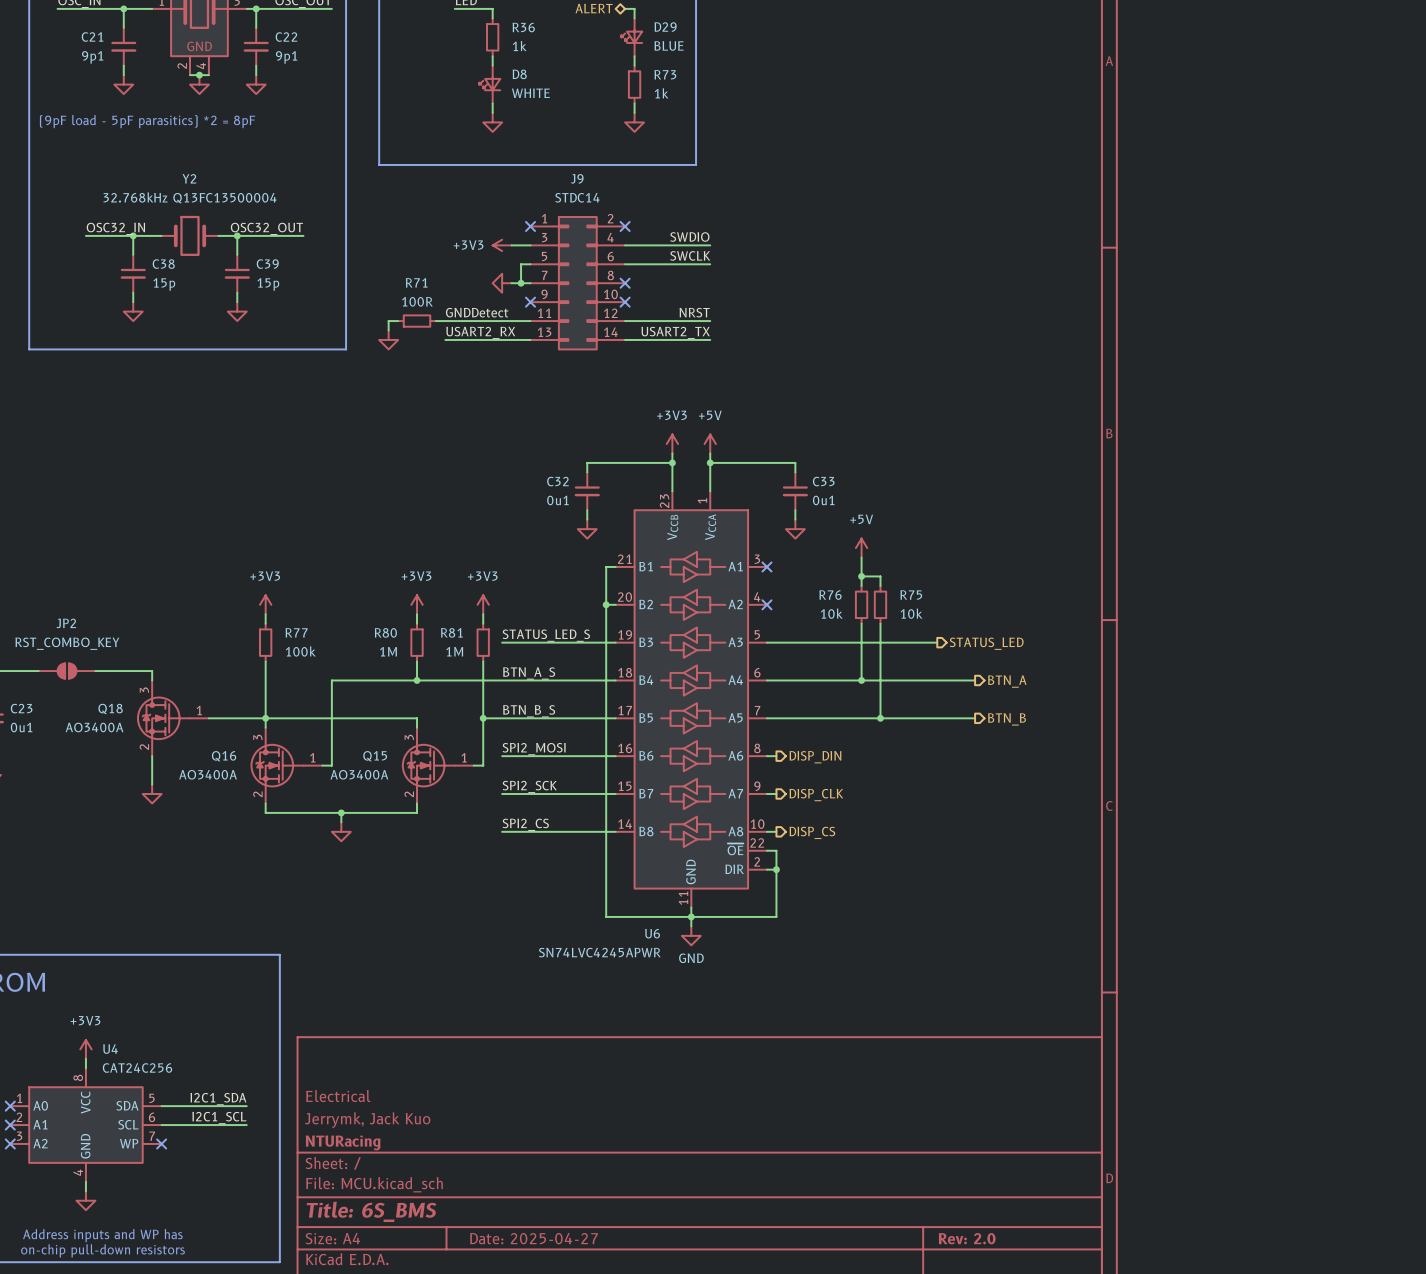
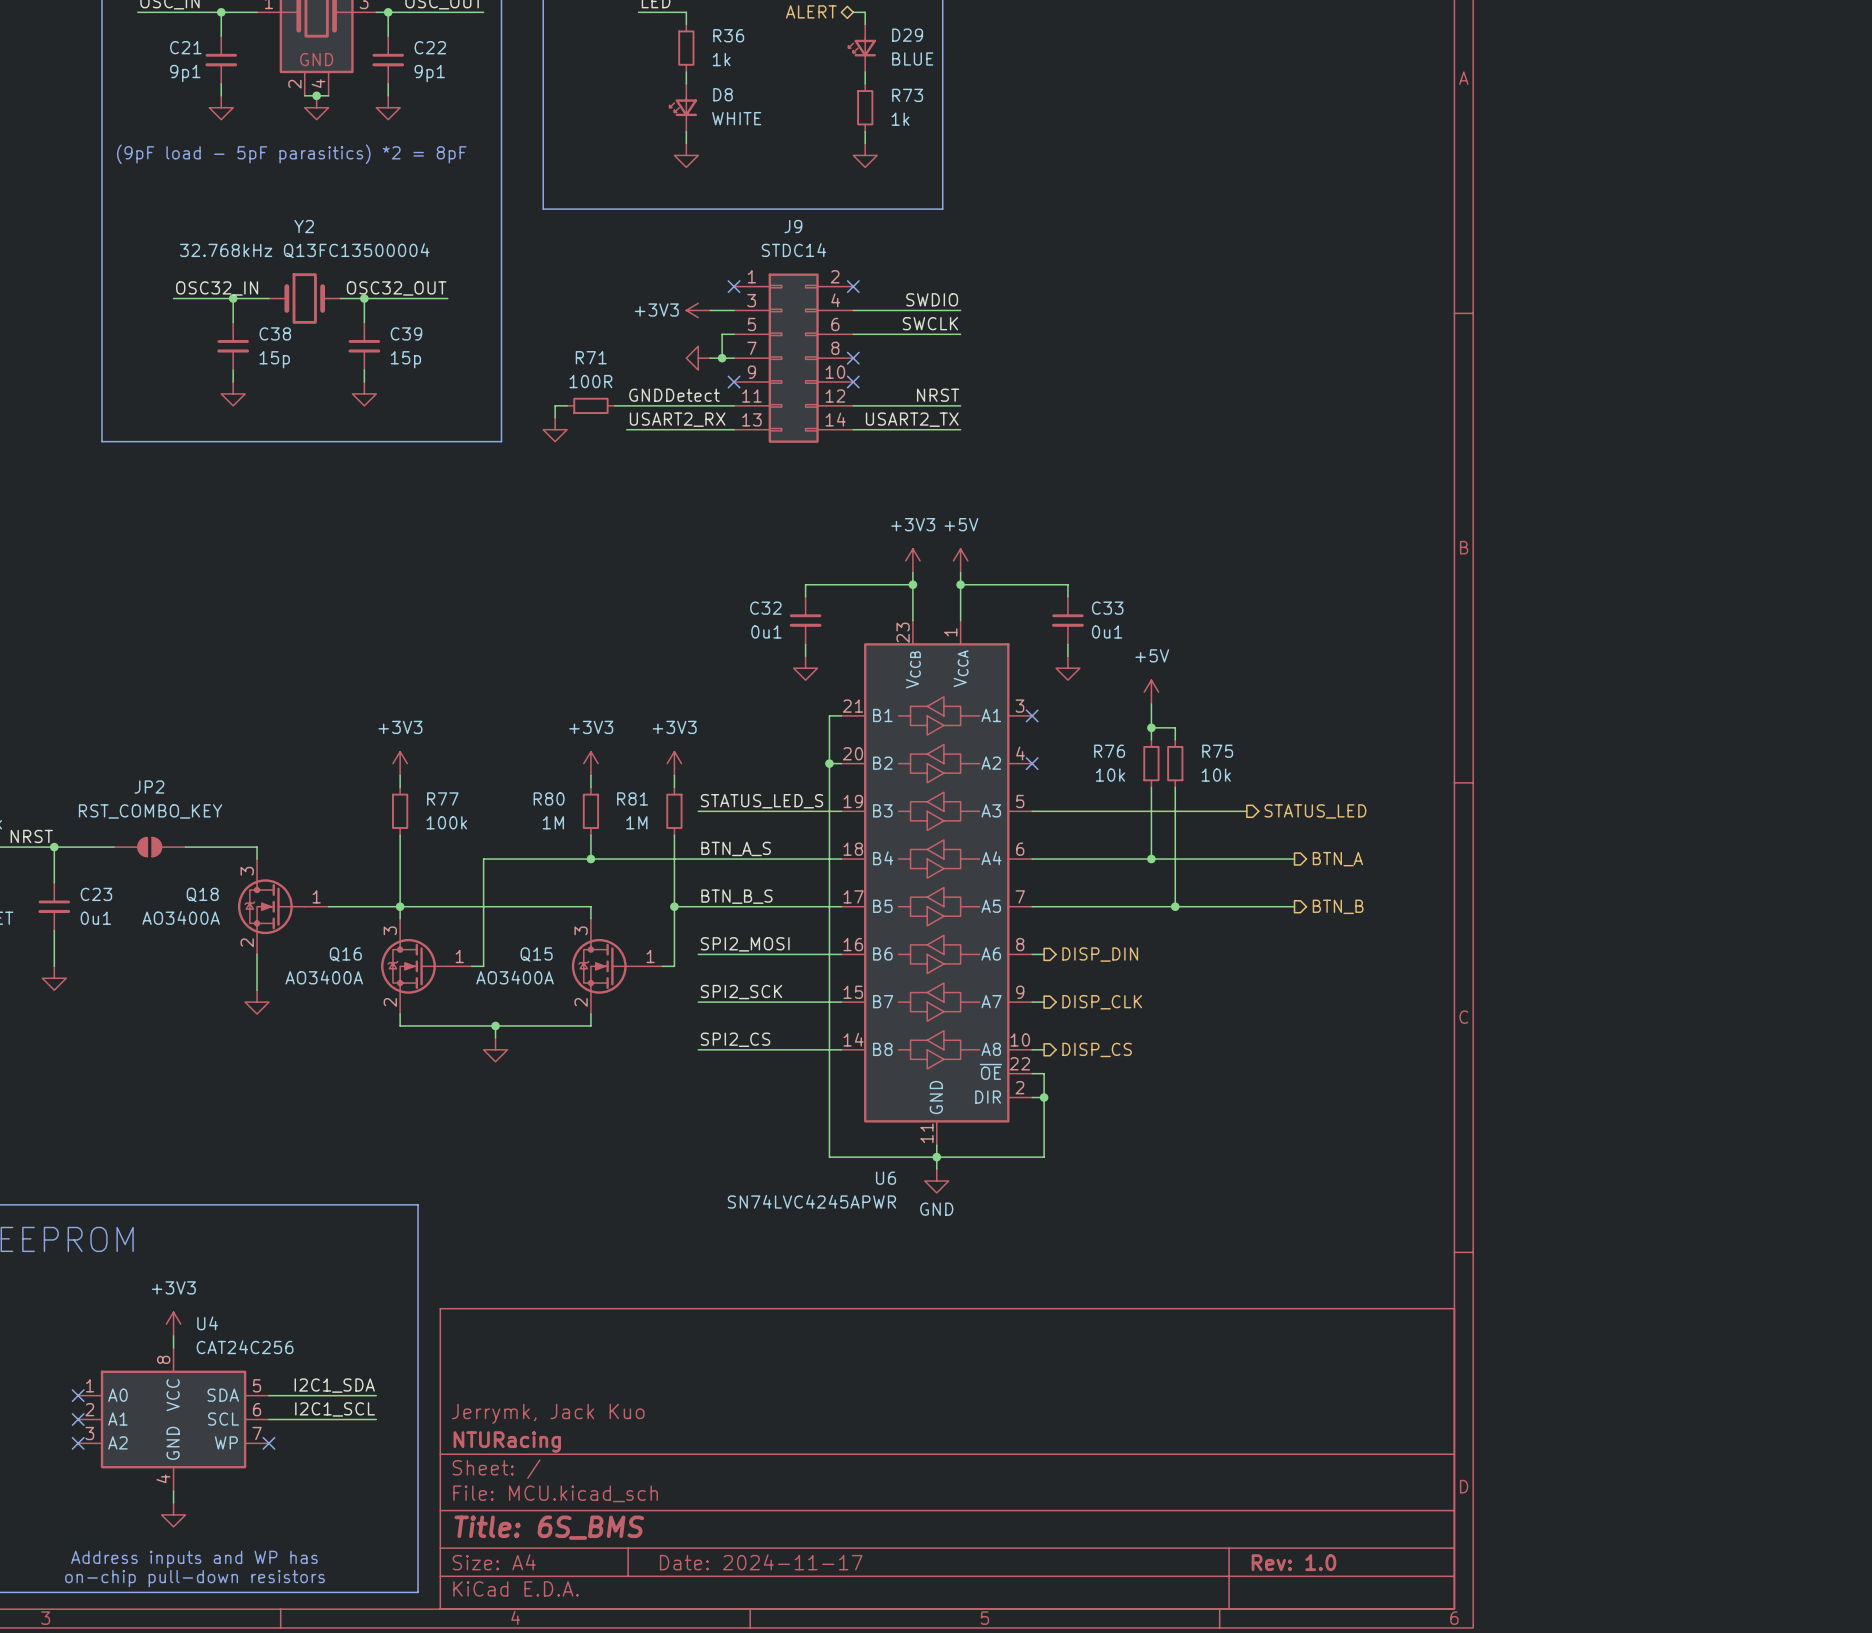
title block: Electrical (338, 1096) -> none
title block: Date: 2025-04-27 (533, 1238) -> Date: 2024-11-17 (761, 1562)
title block: Rev: 2.0 (967, 1238) -> Rev: 1.0 (1293, 1562)

